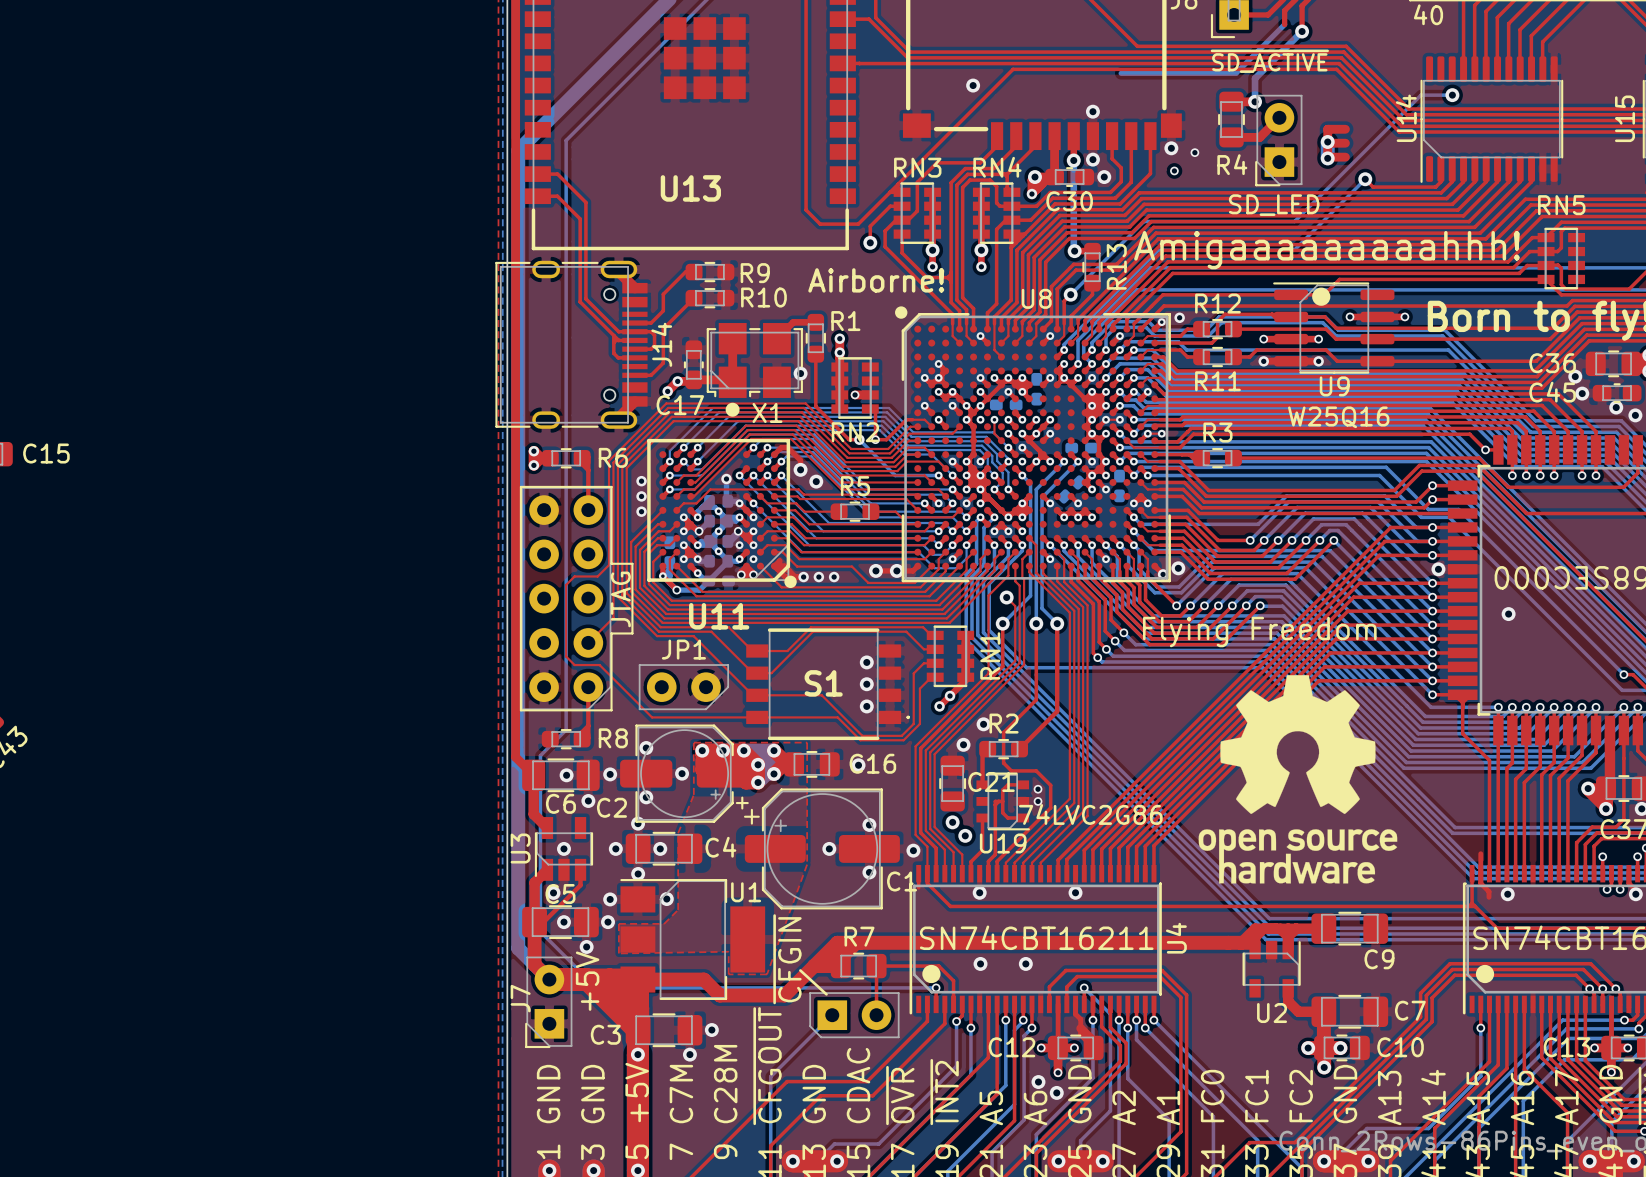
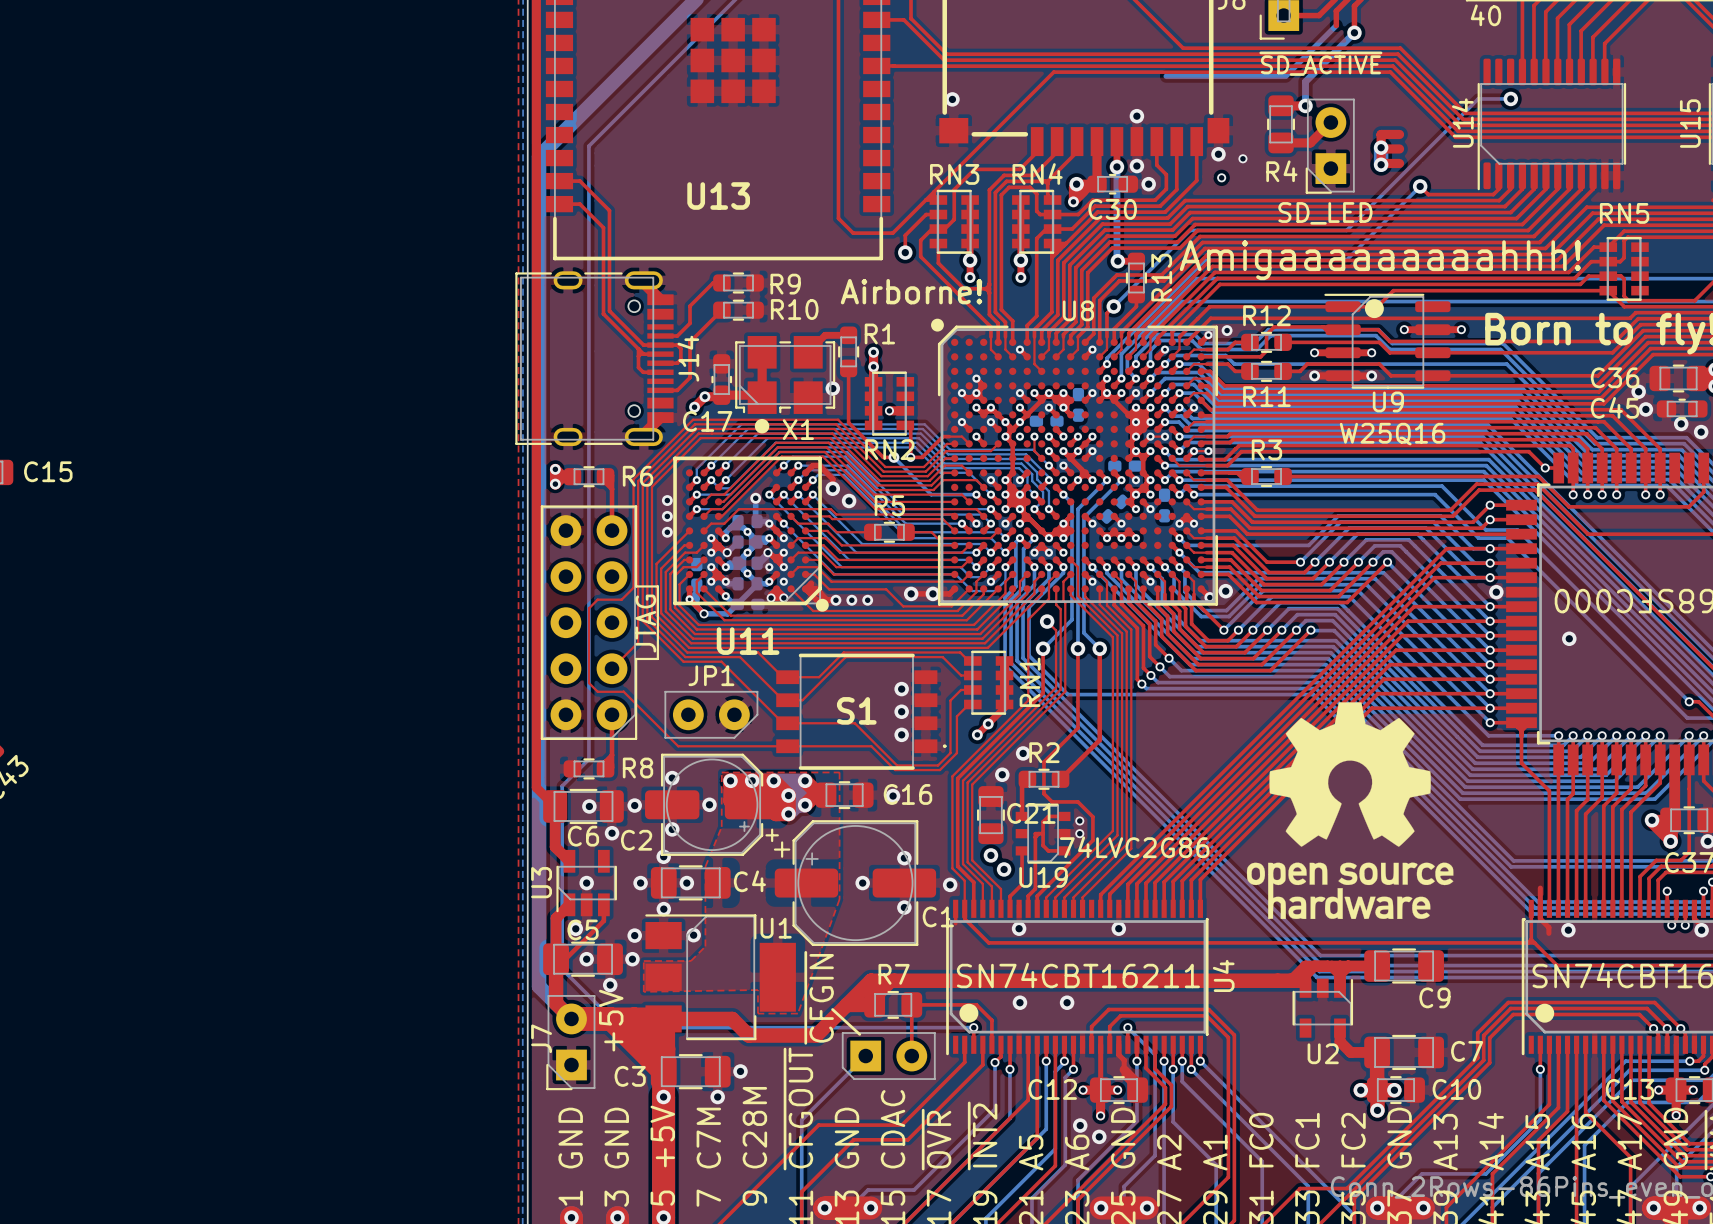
via position: (973, 85) -> (952, 99)
text: Flying Freedom (1259, 632) -> none

